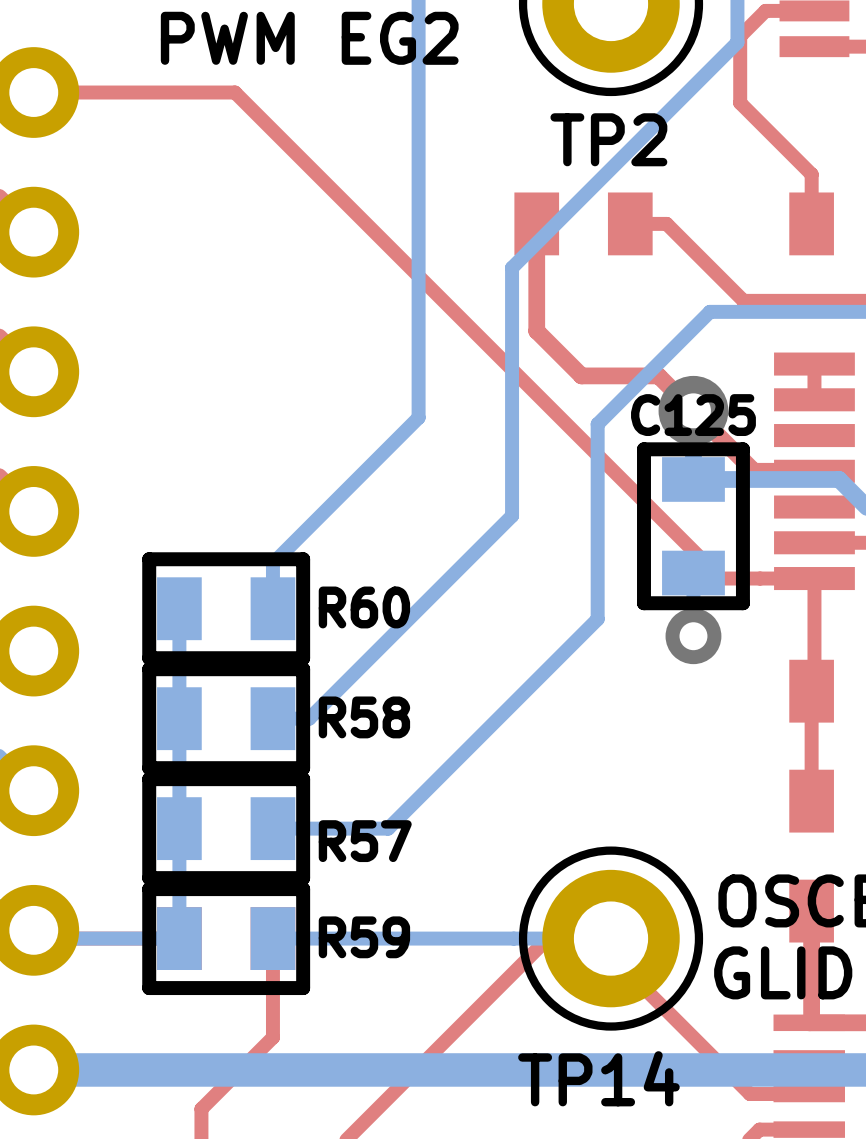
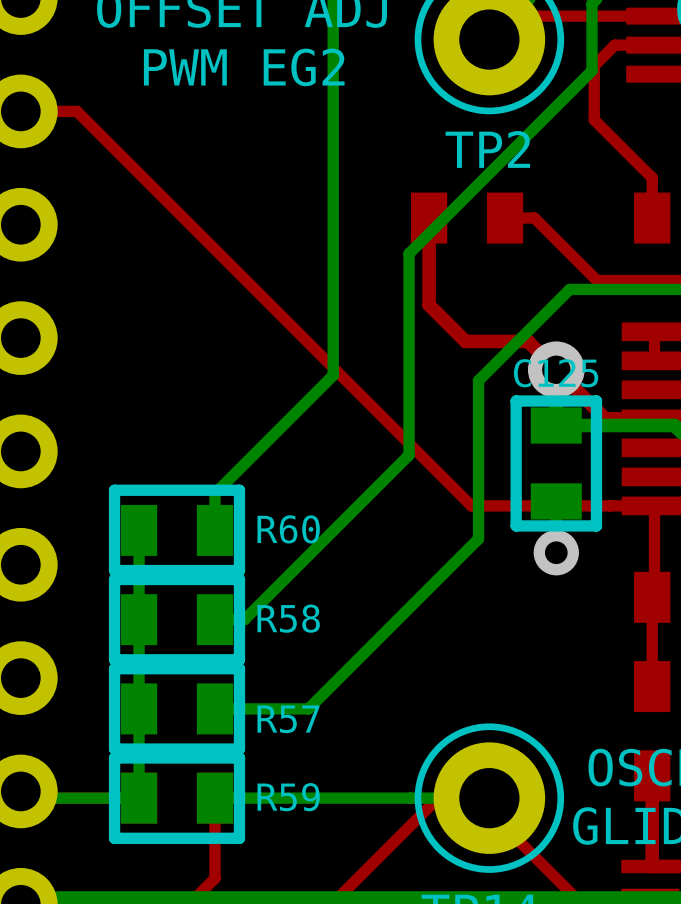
top track: (102, 92) (234, 92) (721, 578) -> (76, 111) (471, 505) (578, 505)

